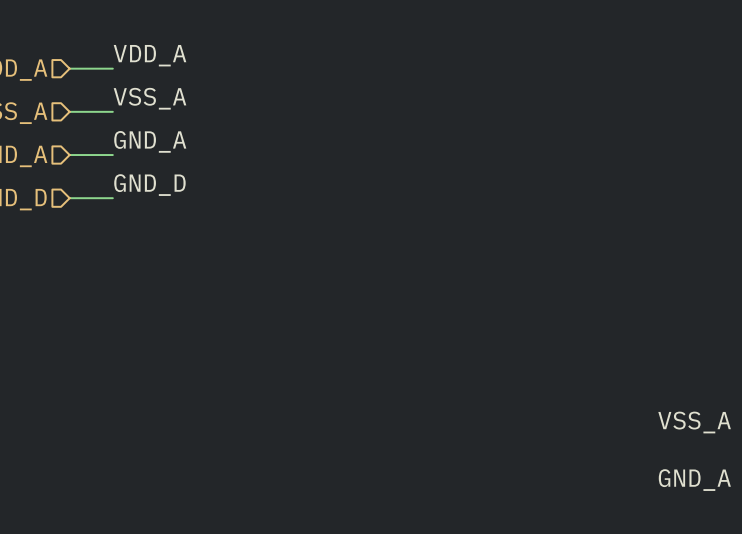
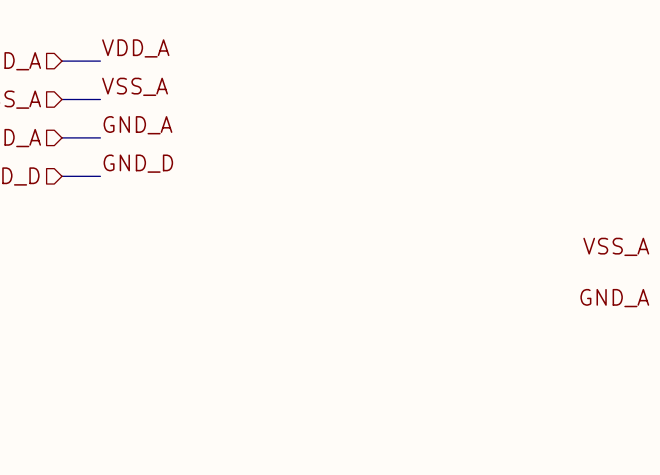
label position: VSS_A (694, 422) -> VSS_A (616, 246)
label position: GND_A (694, 480) -> GND_A (614, 298)

